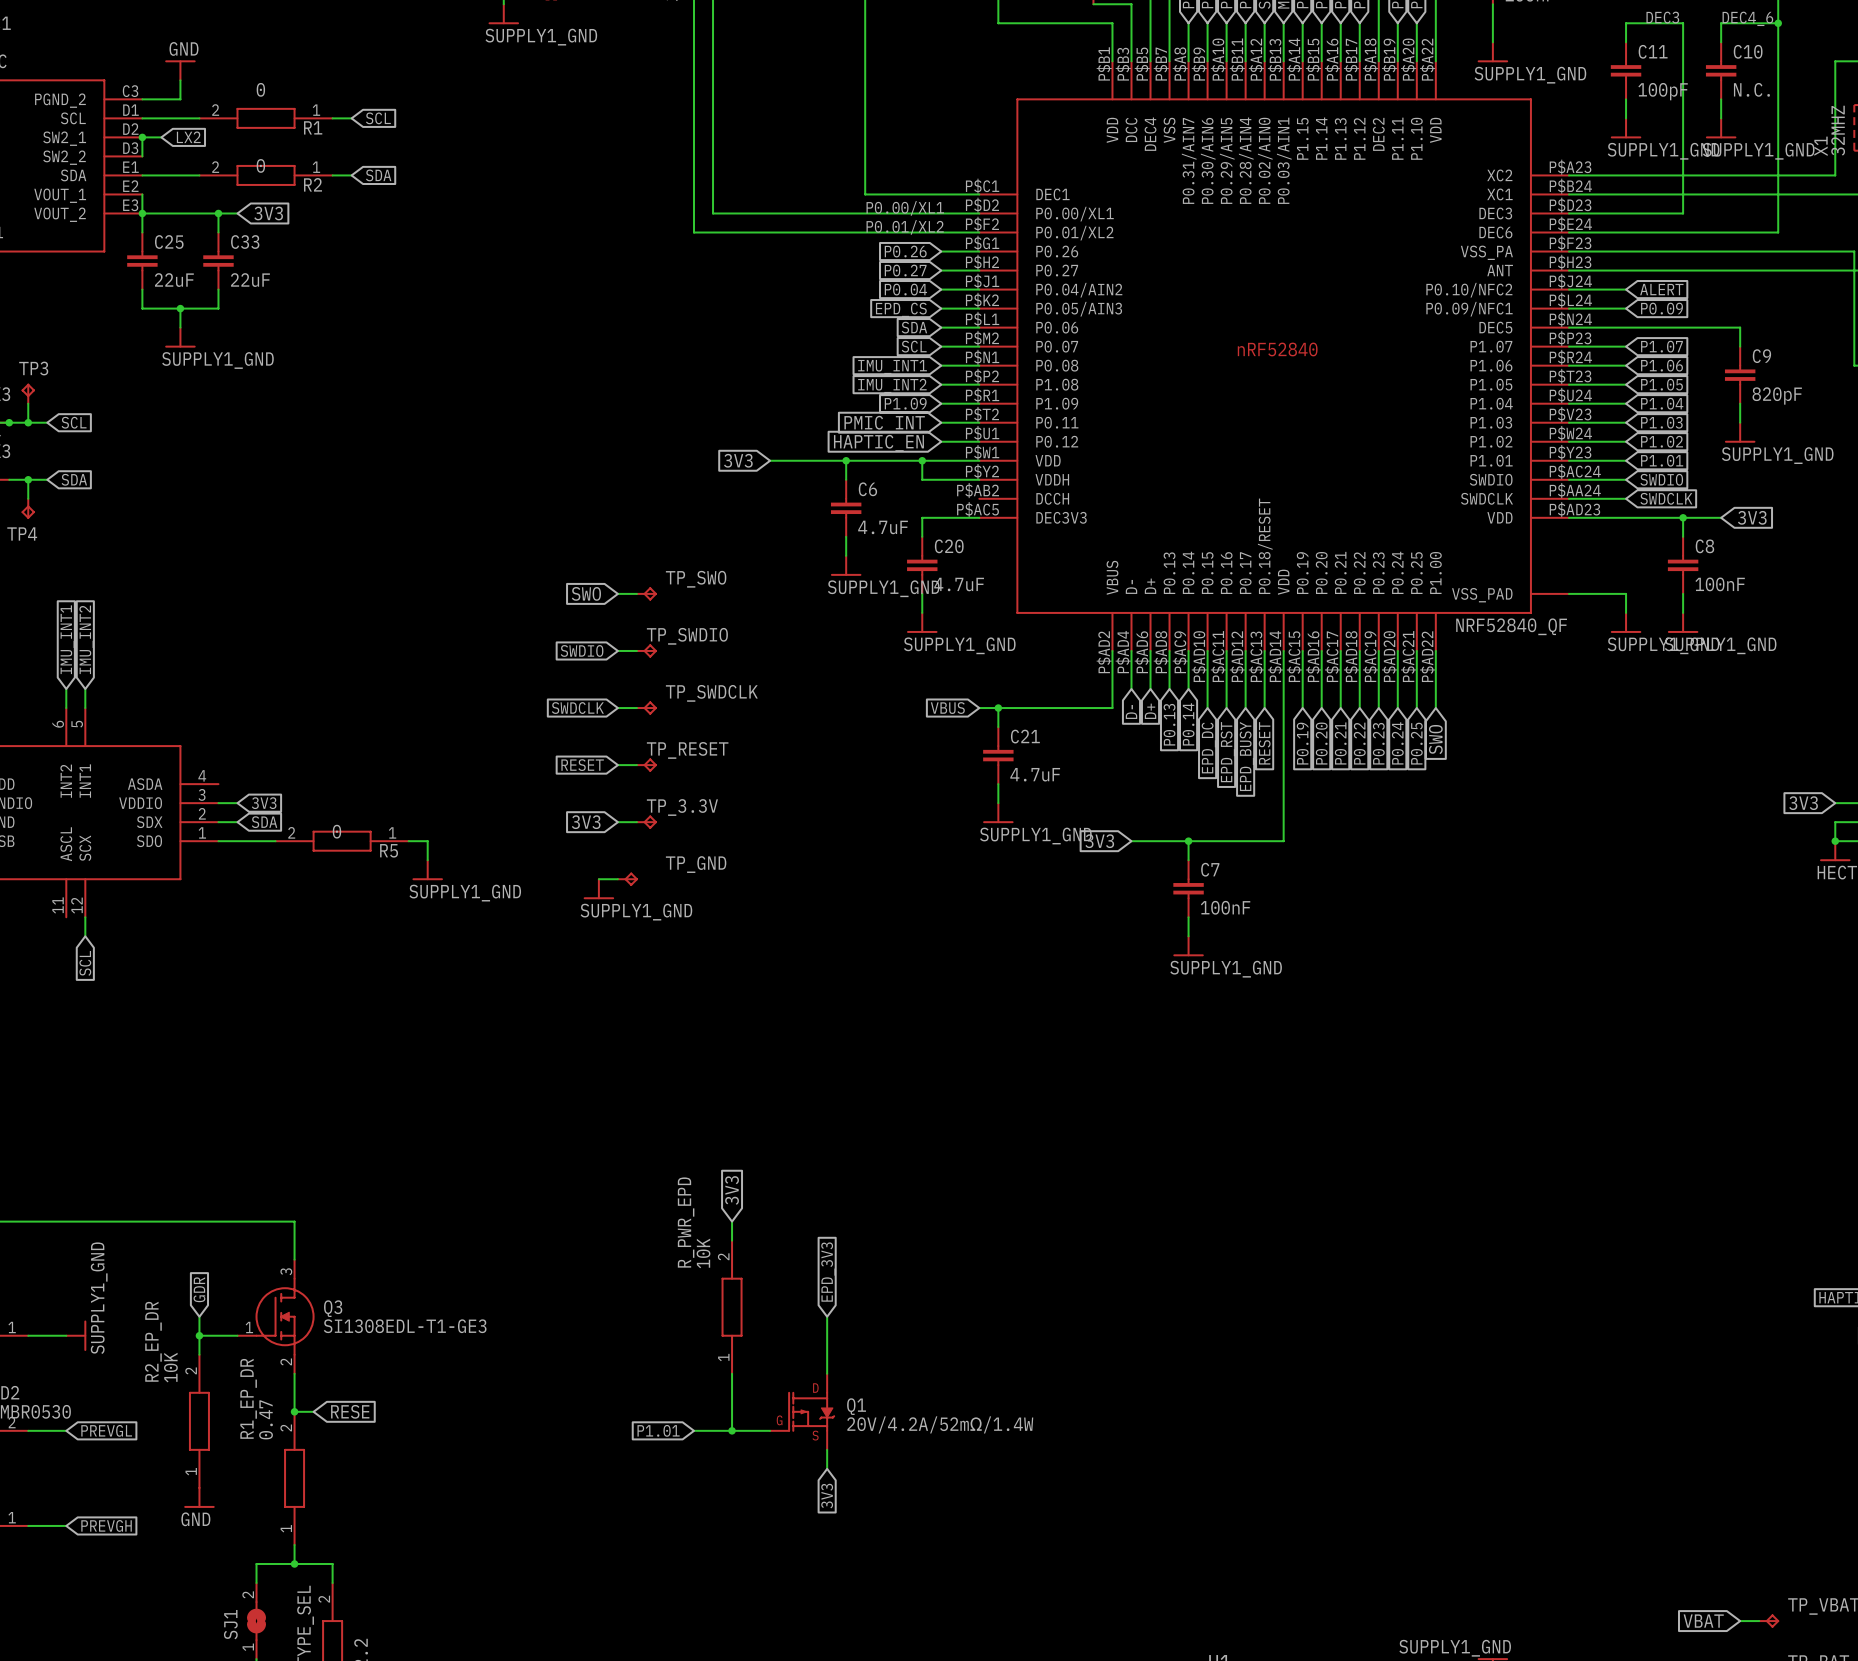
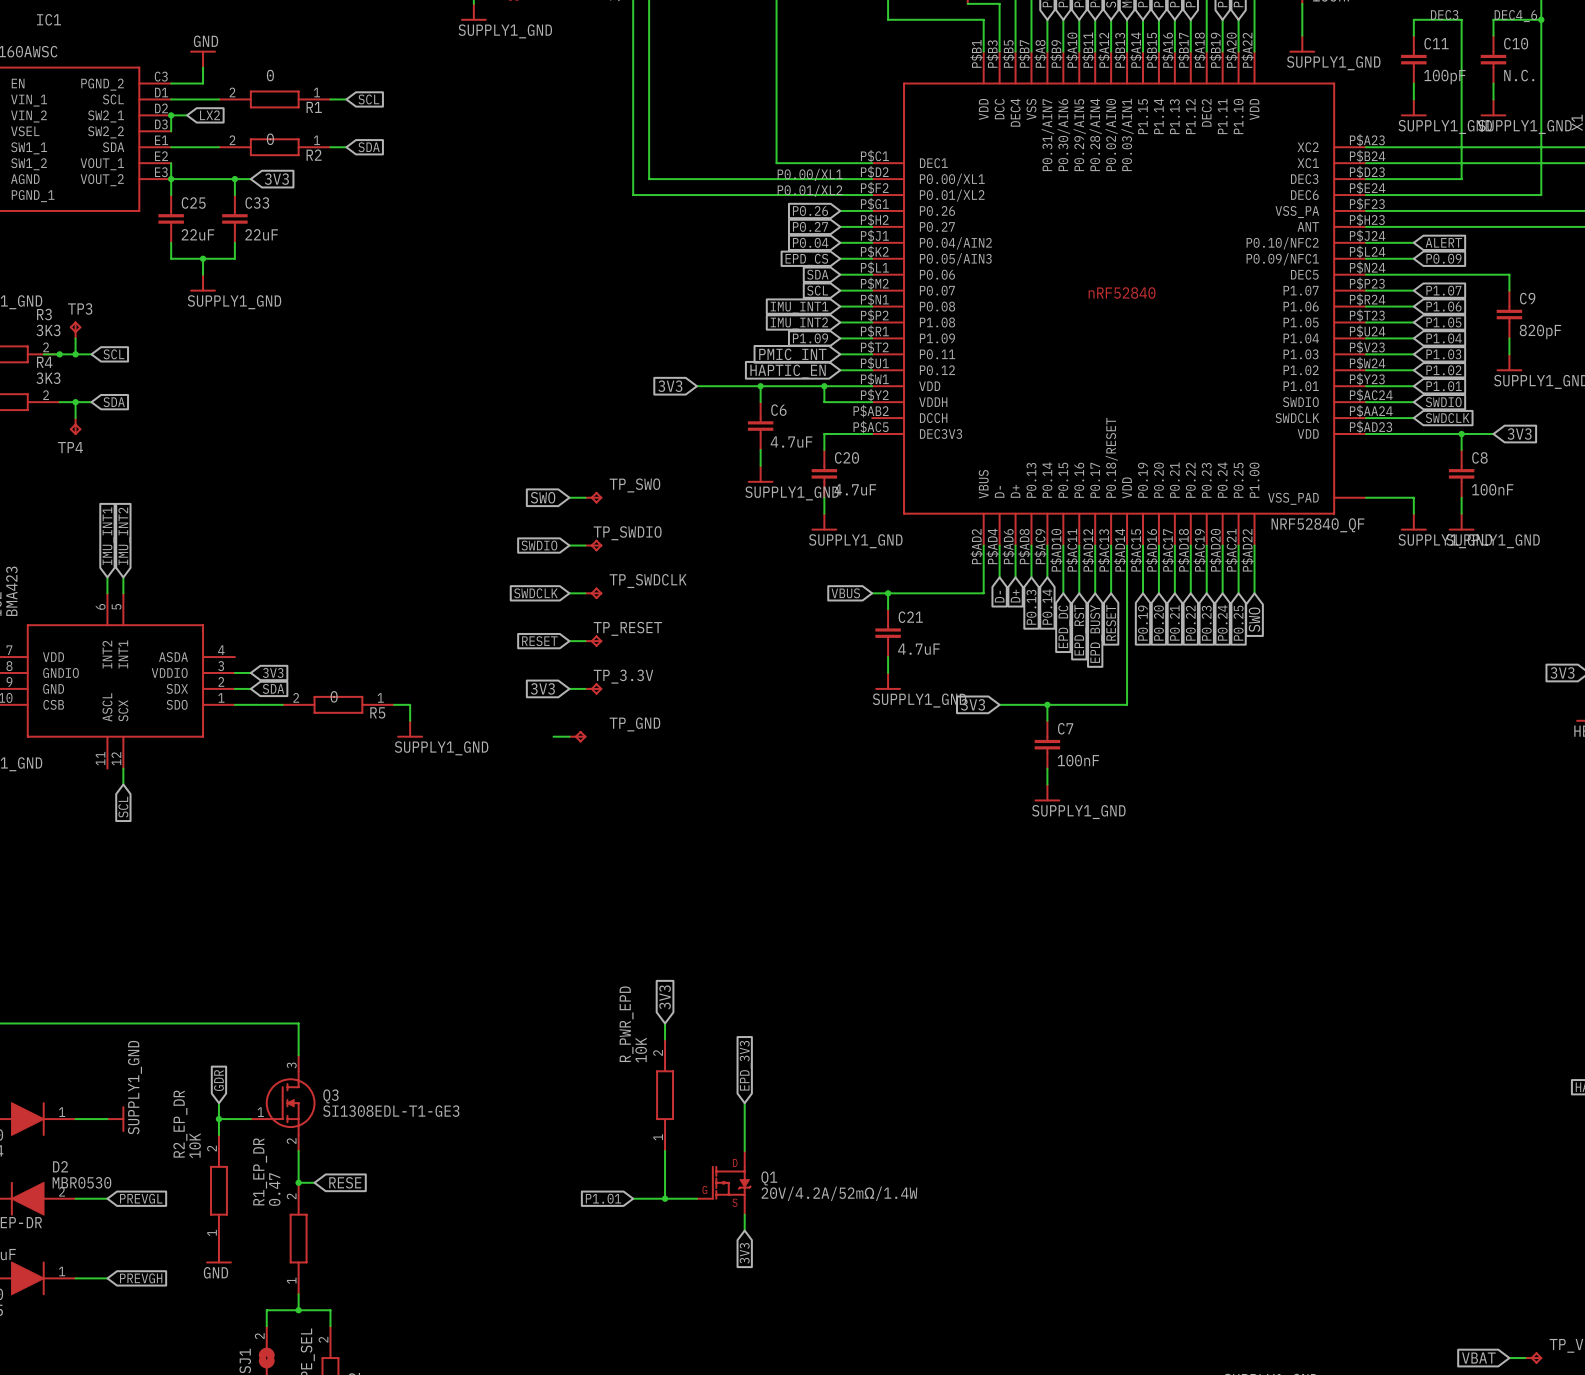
power symbol: SUPPLY1_GND (598, 889) -> none

